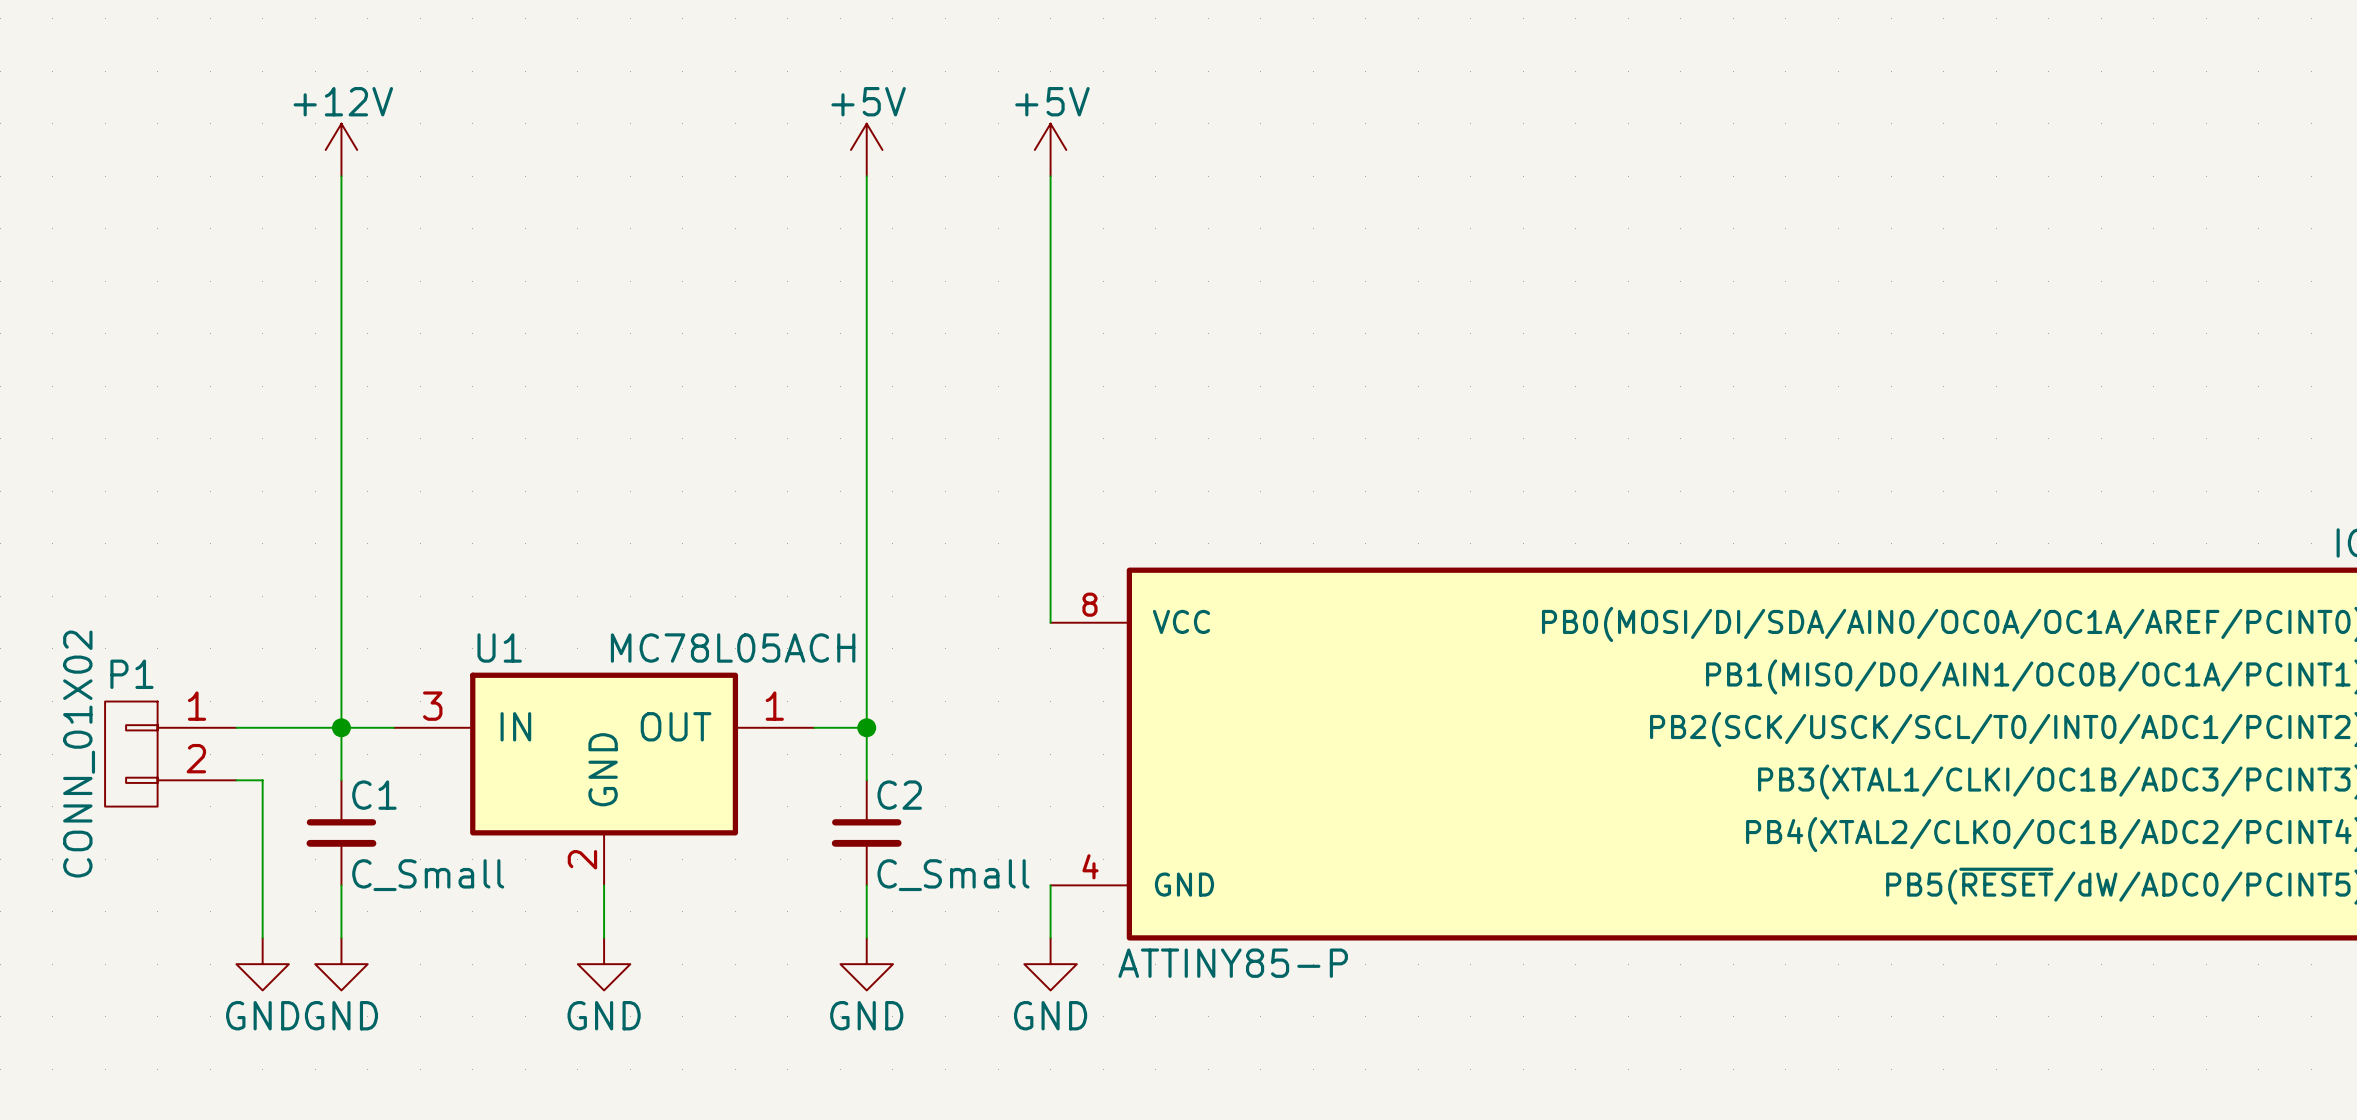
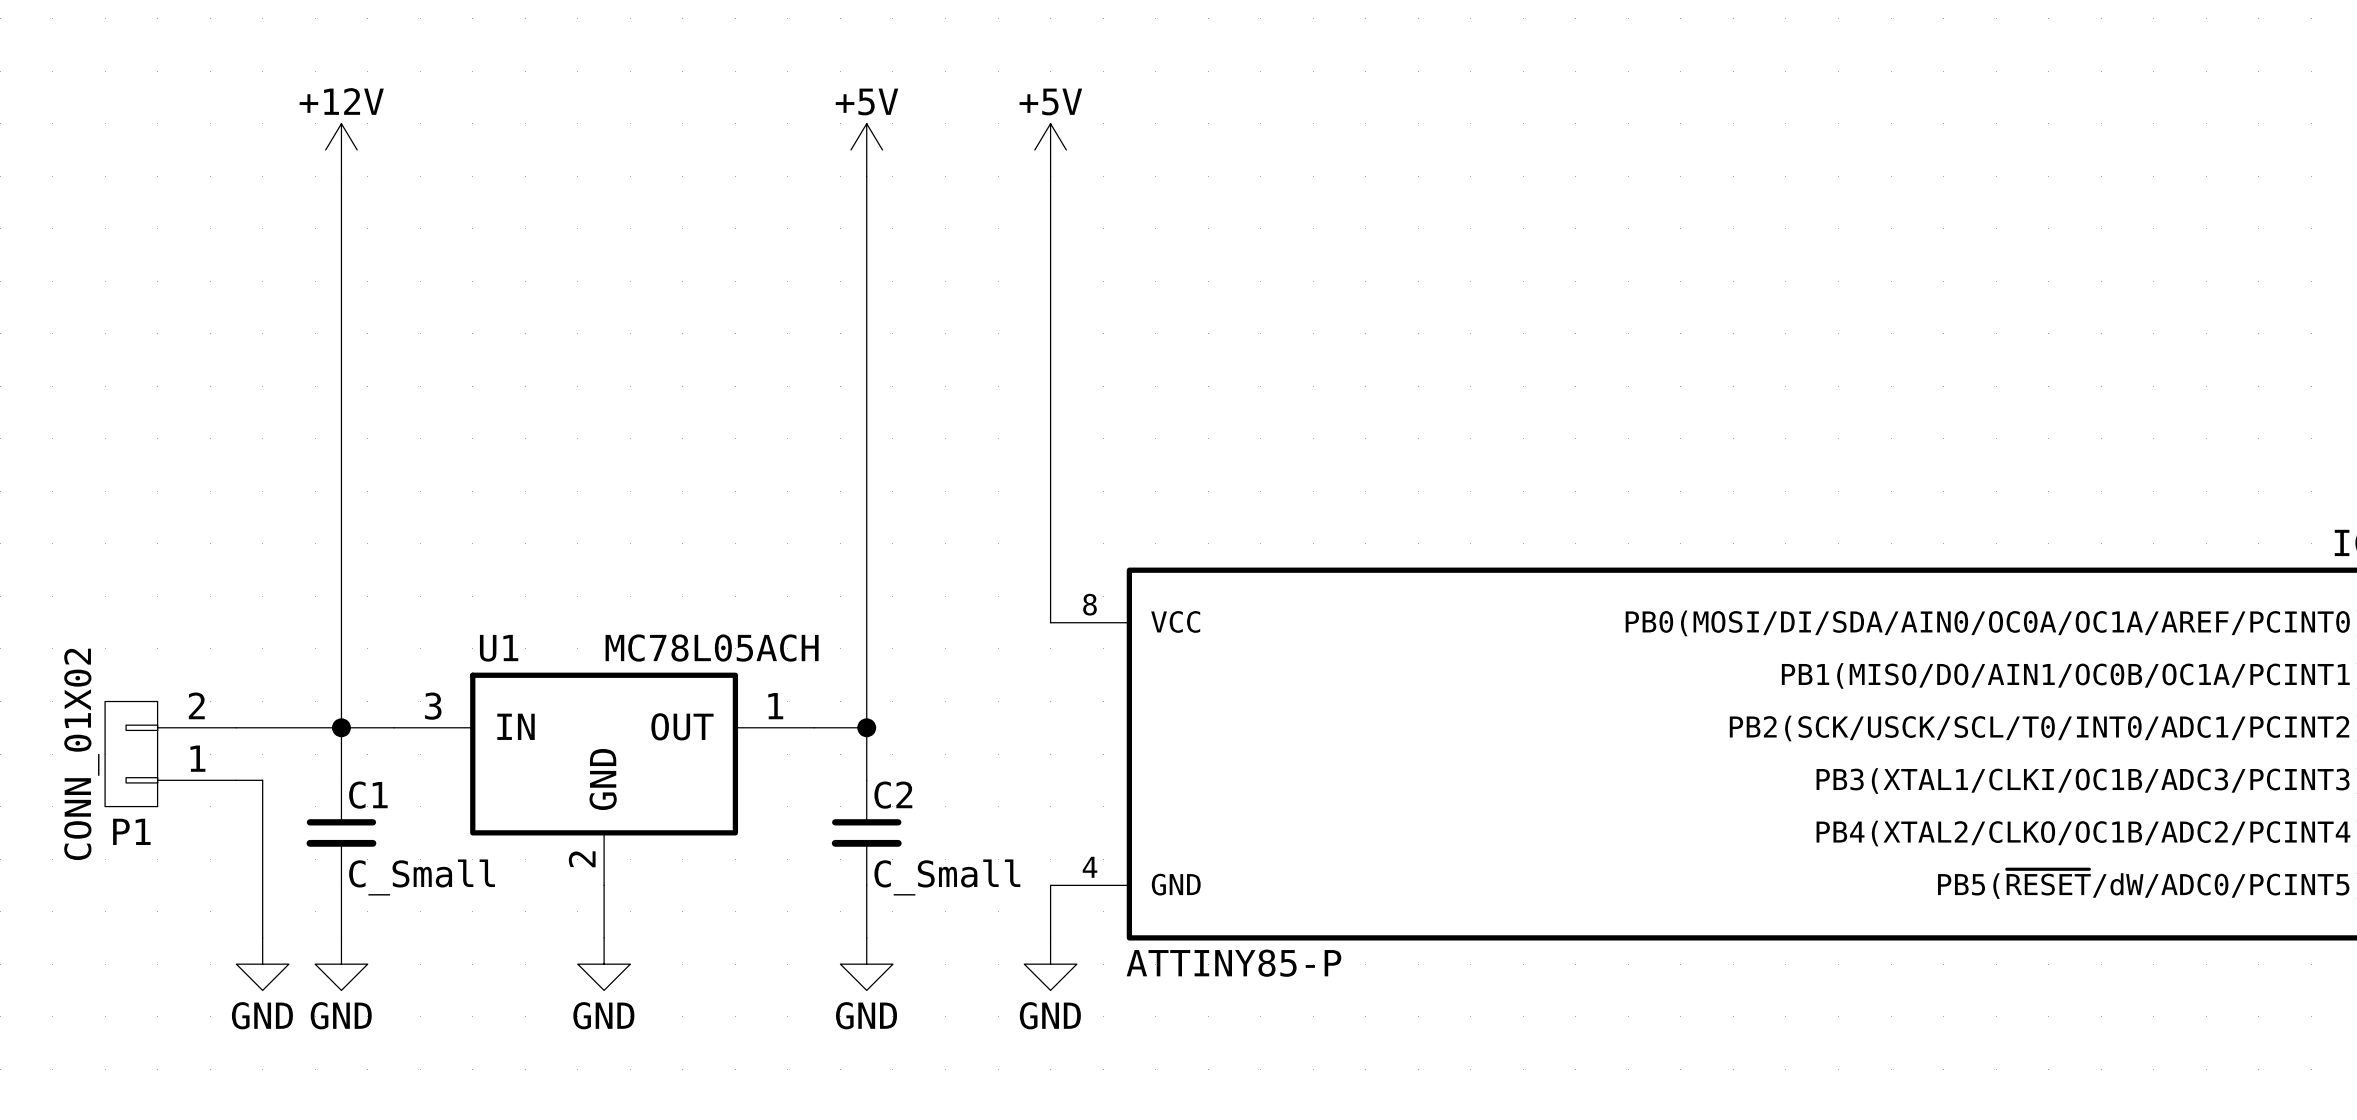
P1 flip: as is (131, 754) -> up-down (131, 754)

